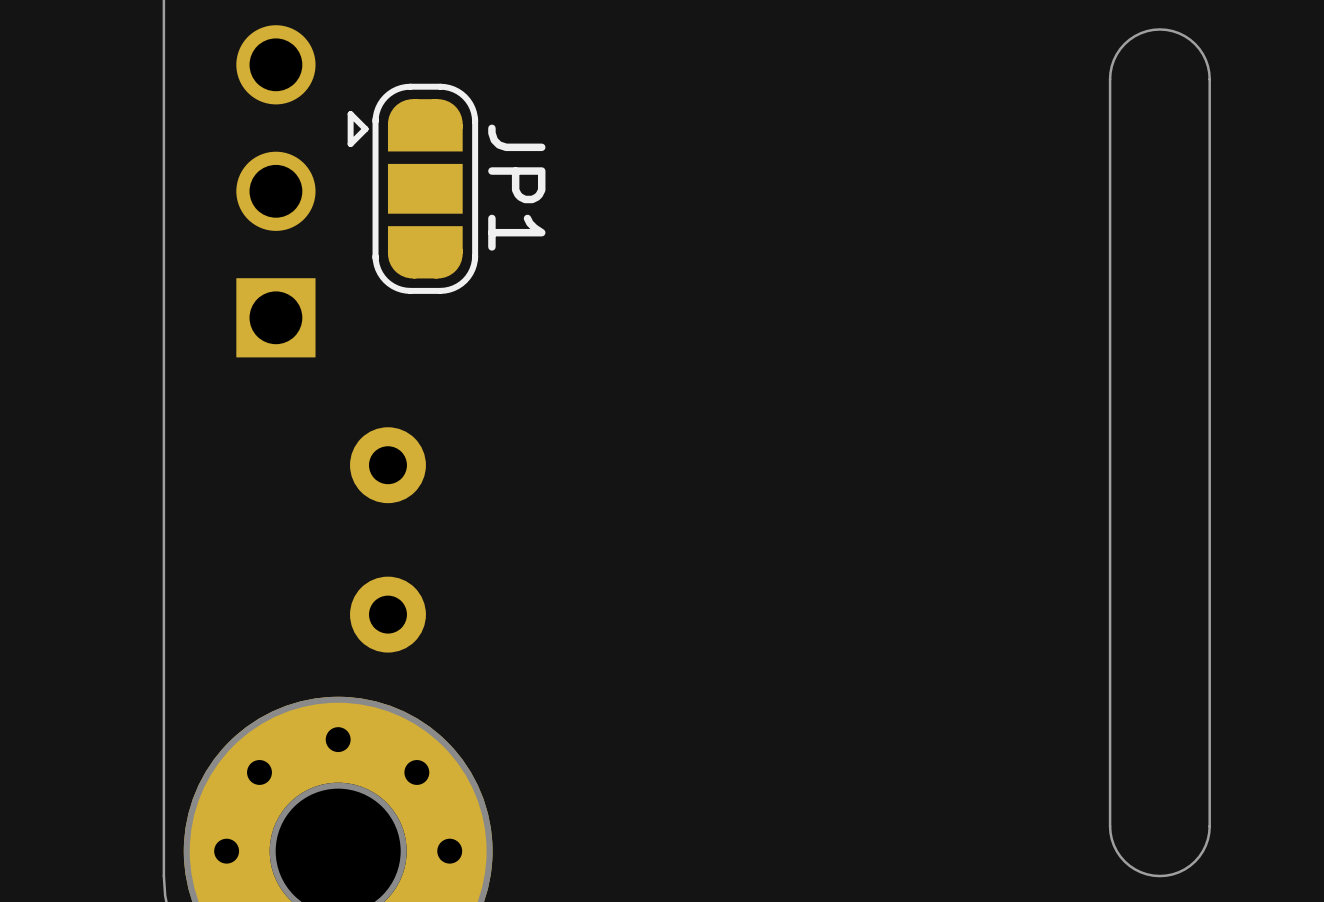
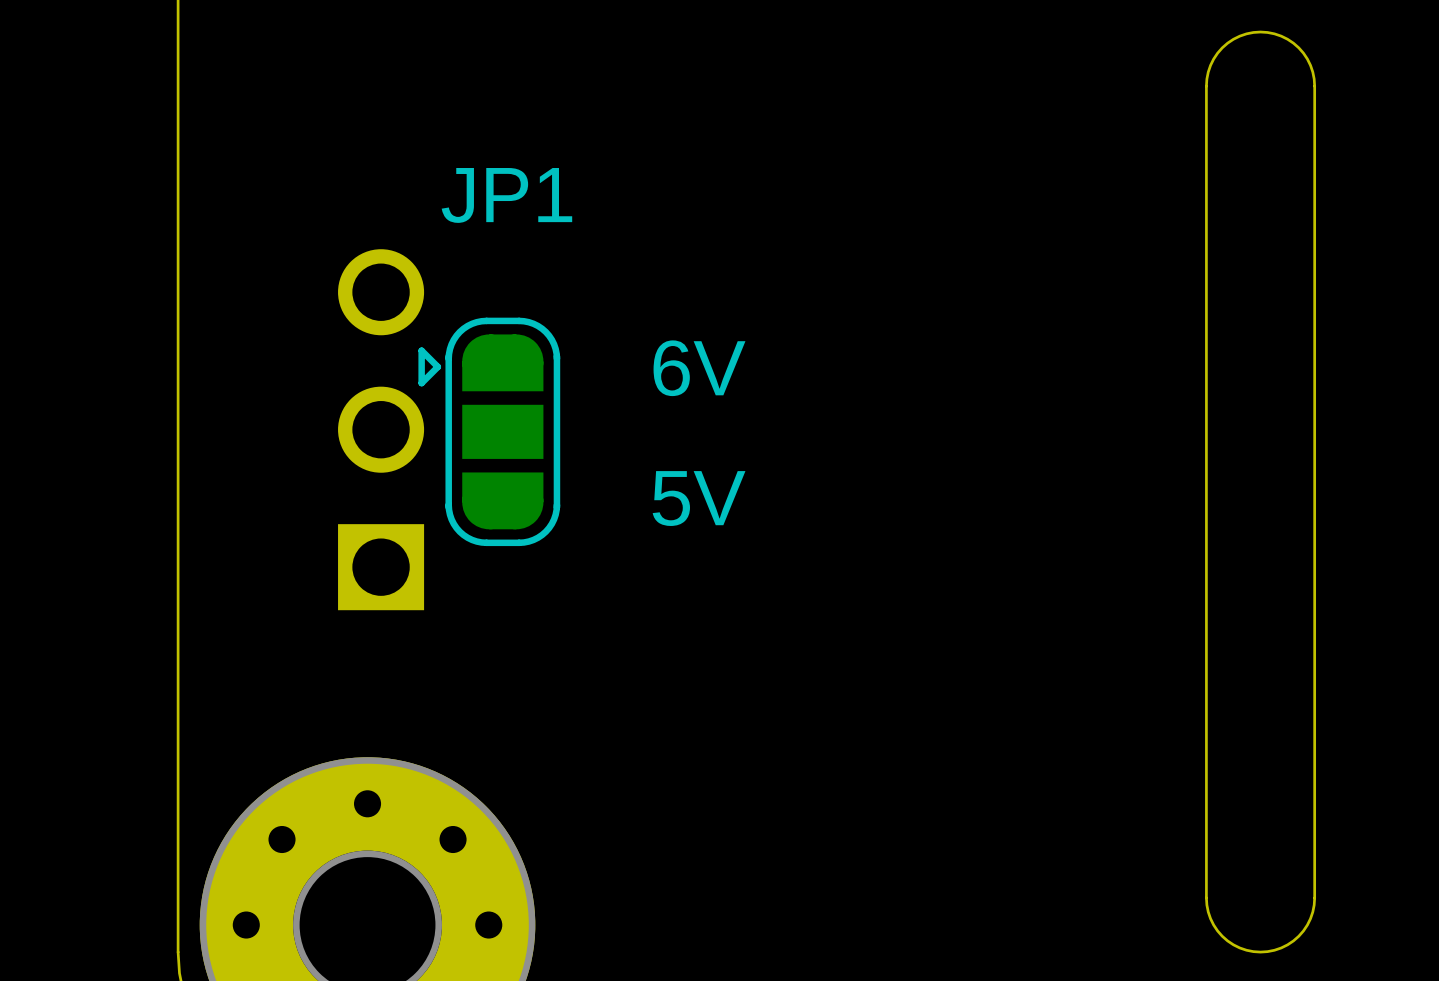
JP1 name rotation: 0° (516, 187) -> 90° counterclockwise (506, 195)
JP1 position: (412, 188) -> (489, 431)
part position: (275, 191) -> (381, 429)
text: none -> 6V (699, 368)
text: none -> 5V (699, 498)
part: (387, 465) -> none
part: (387, 614) -> none

